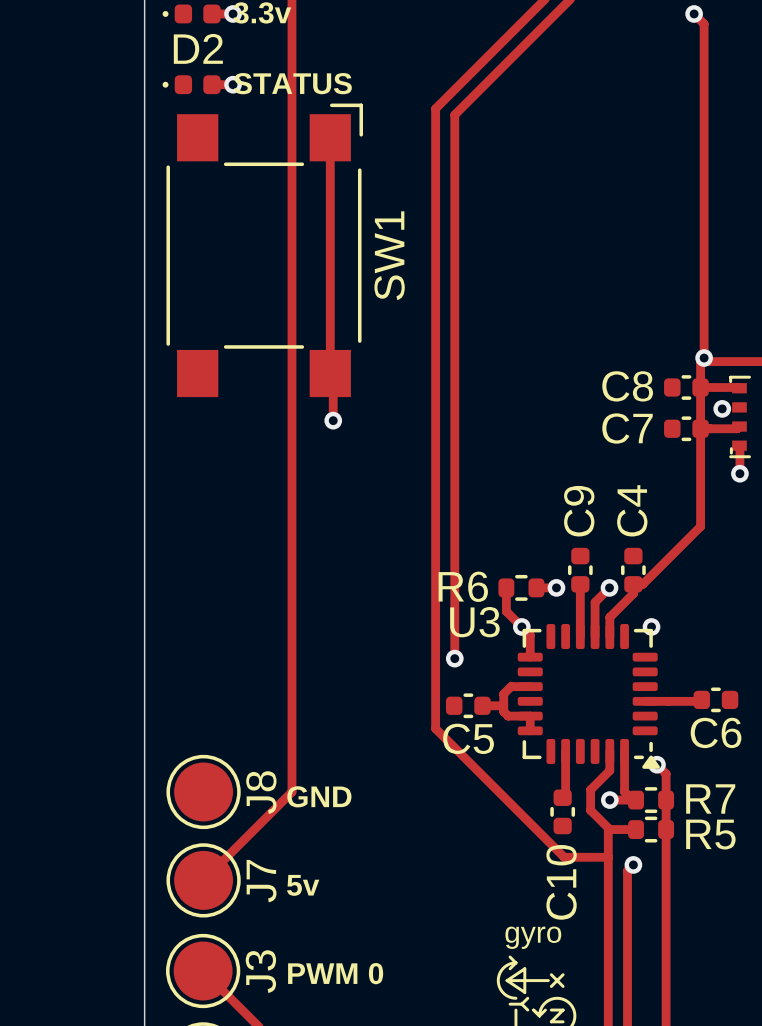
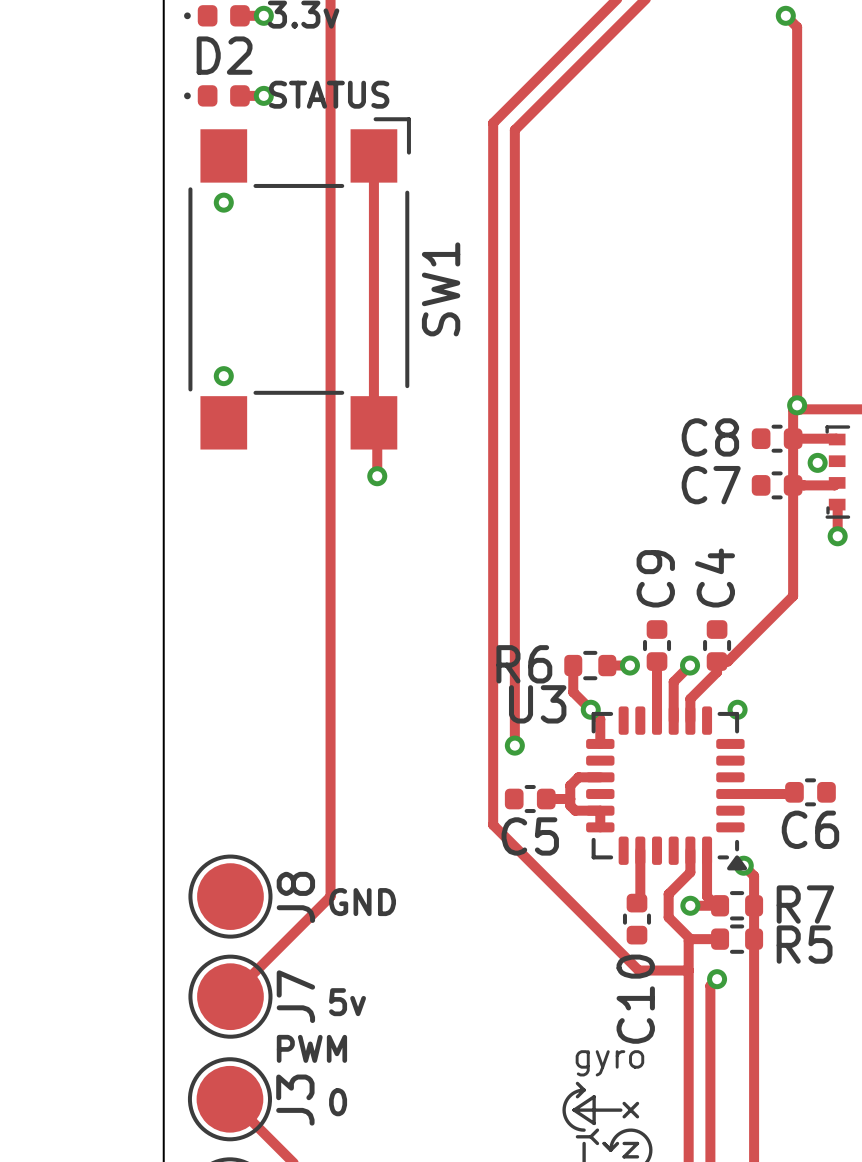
via: none -> (223, 202)
via: none -> (223, 376)
text: none -> PWM (311, 1048)
text: PWM 0 (335, 973) -> 0 (338, 1102)

